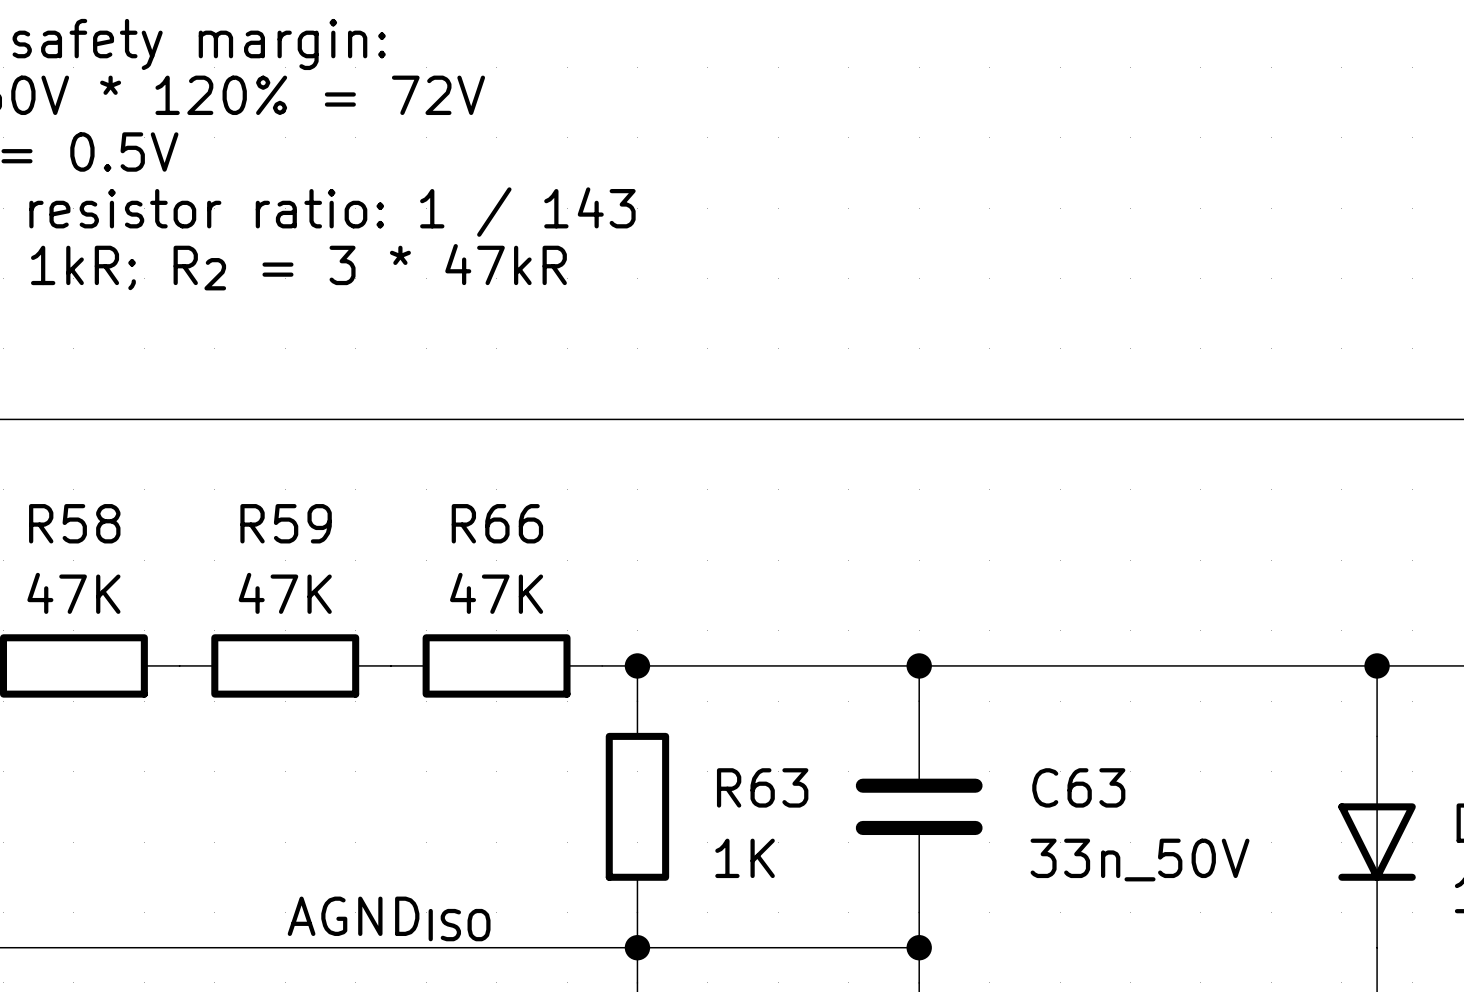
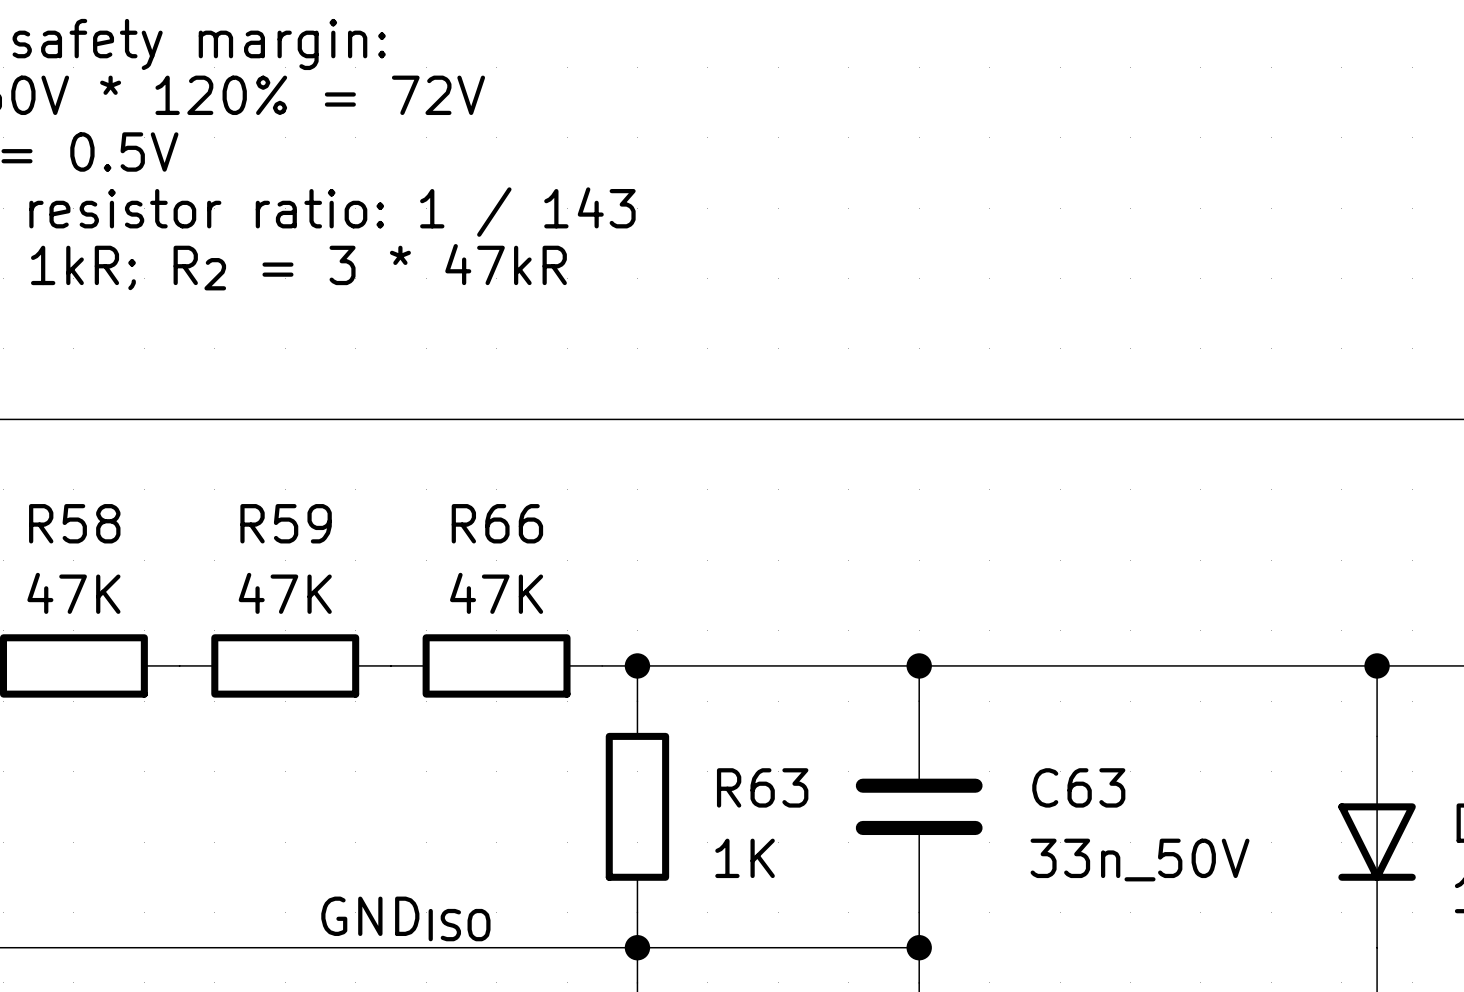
label: AGNDISO (389, 918) -> GNDISO (405, 918)

